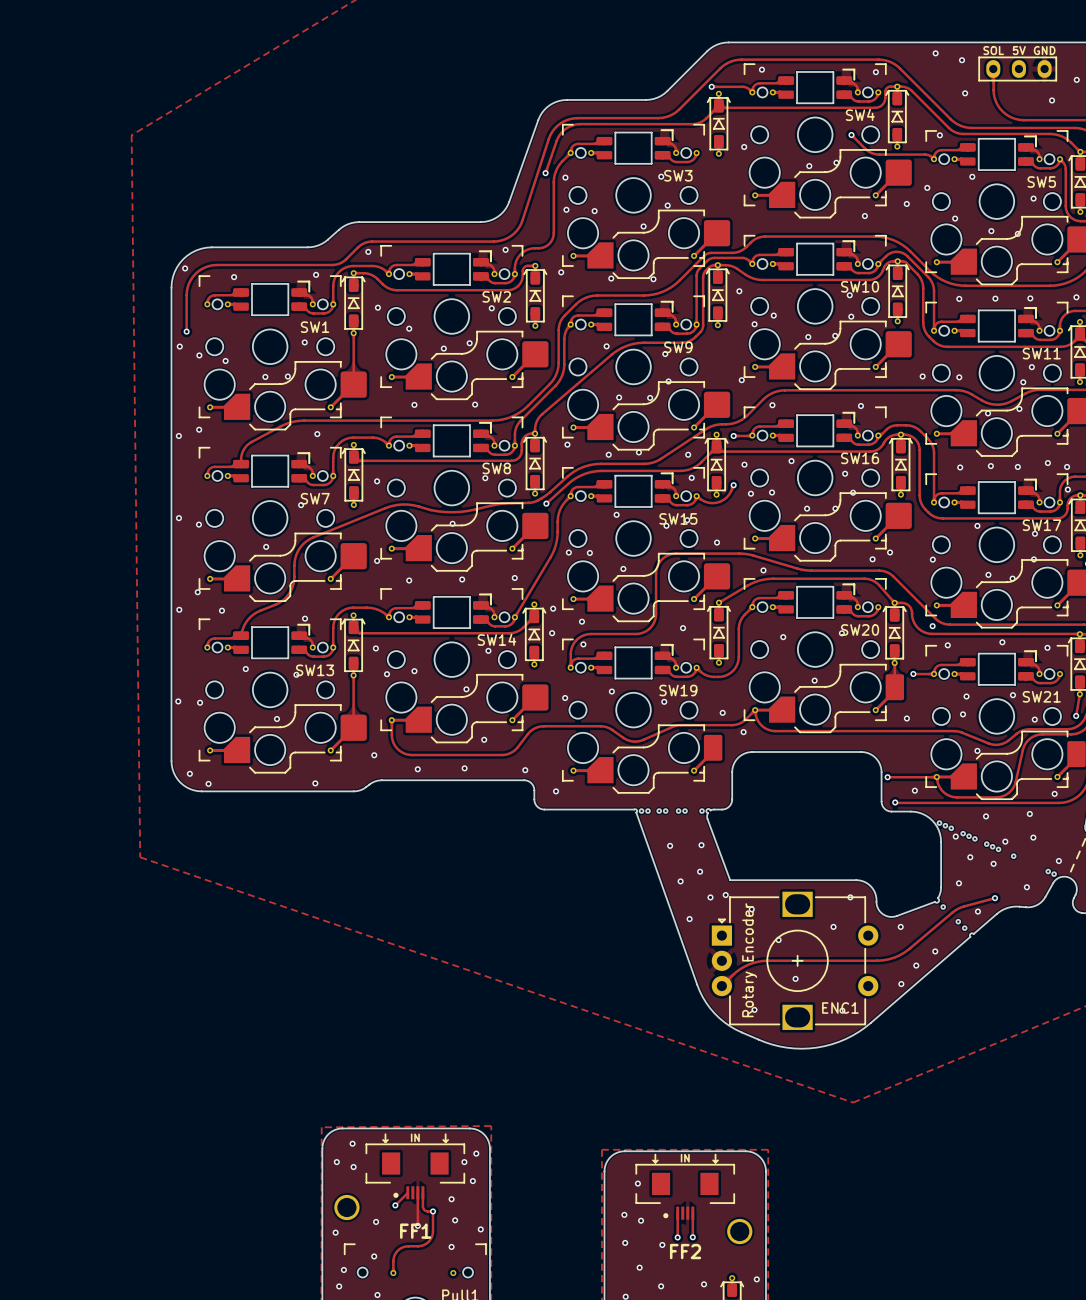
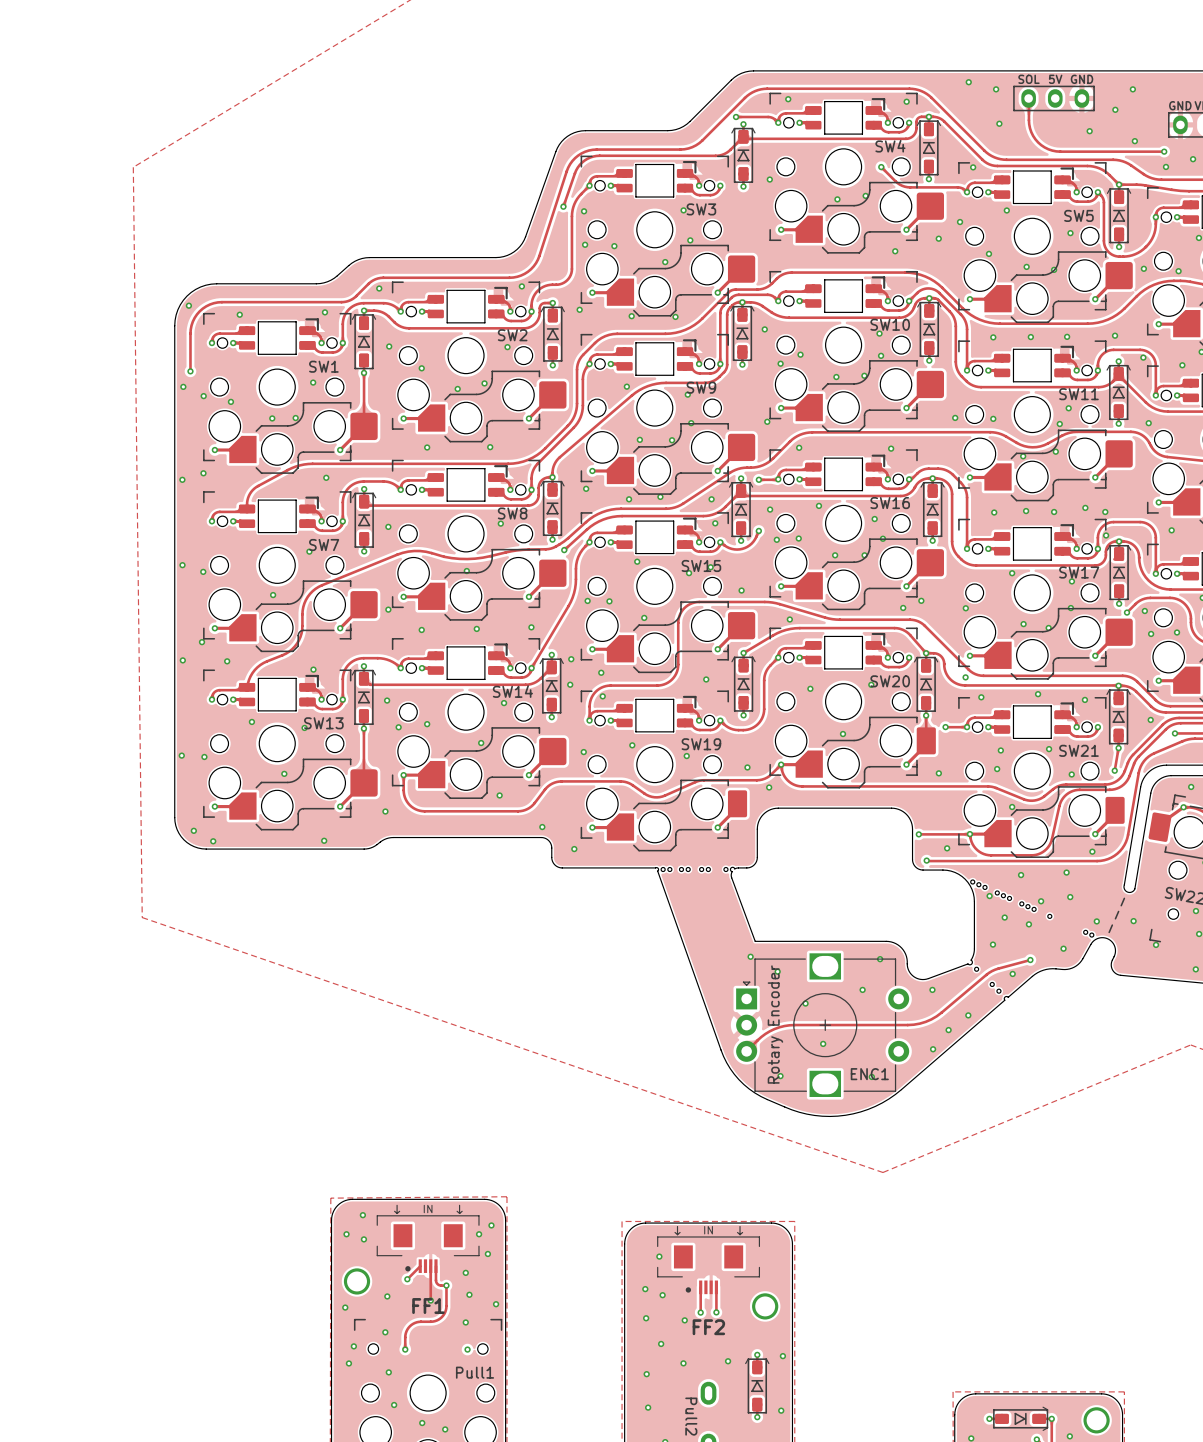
via: (464, 768) -> none
via: (417, 769) -> none
via: (670, 845) -> none
via: (701, 845) -> none
via: (700, 871) -> none
via: (680, 881) -> none
via: (710, 897) -> none
via: (689, 919) -> none

